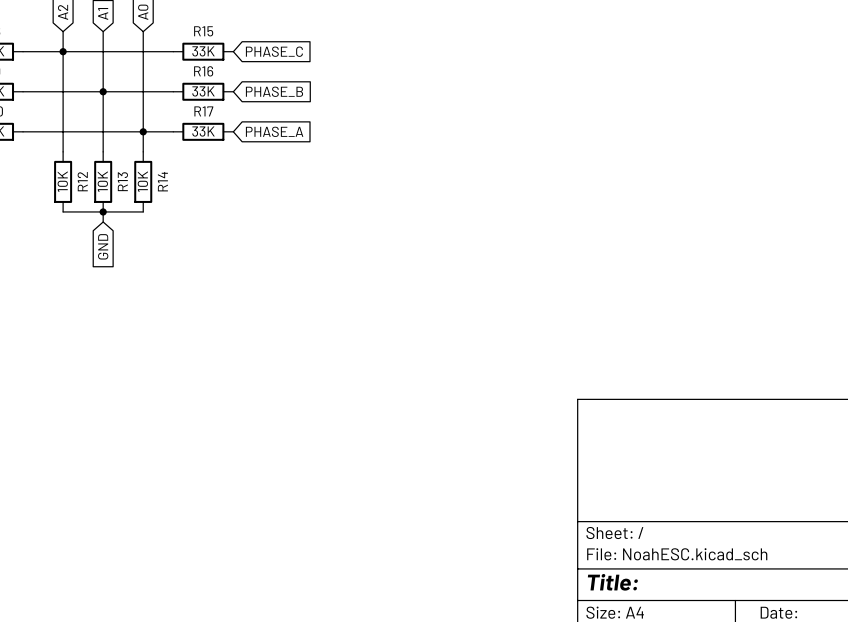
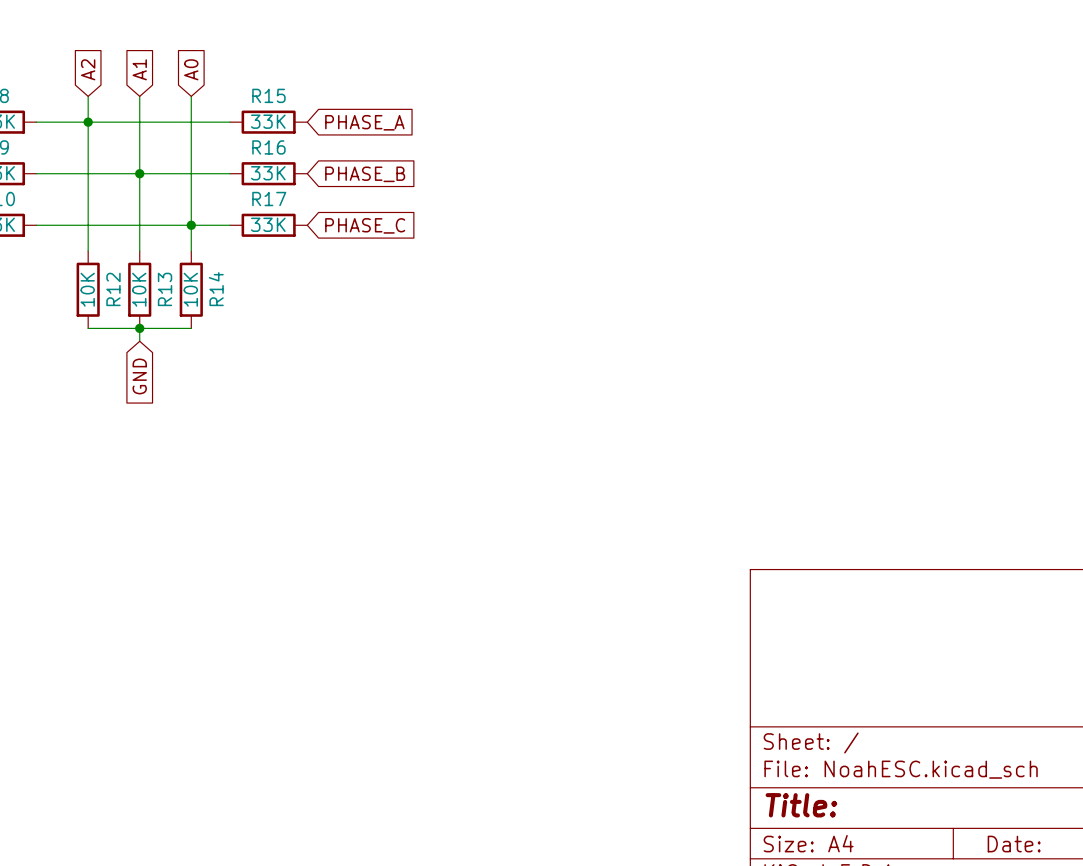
global label: PHASE_C (274, 51) -> PHASE_A (364, 122)
global label: PHASE_A (274, 131) -> PHASE_C (365, 225)

